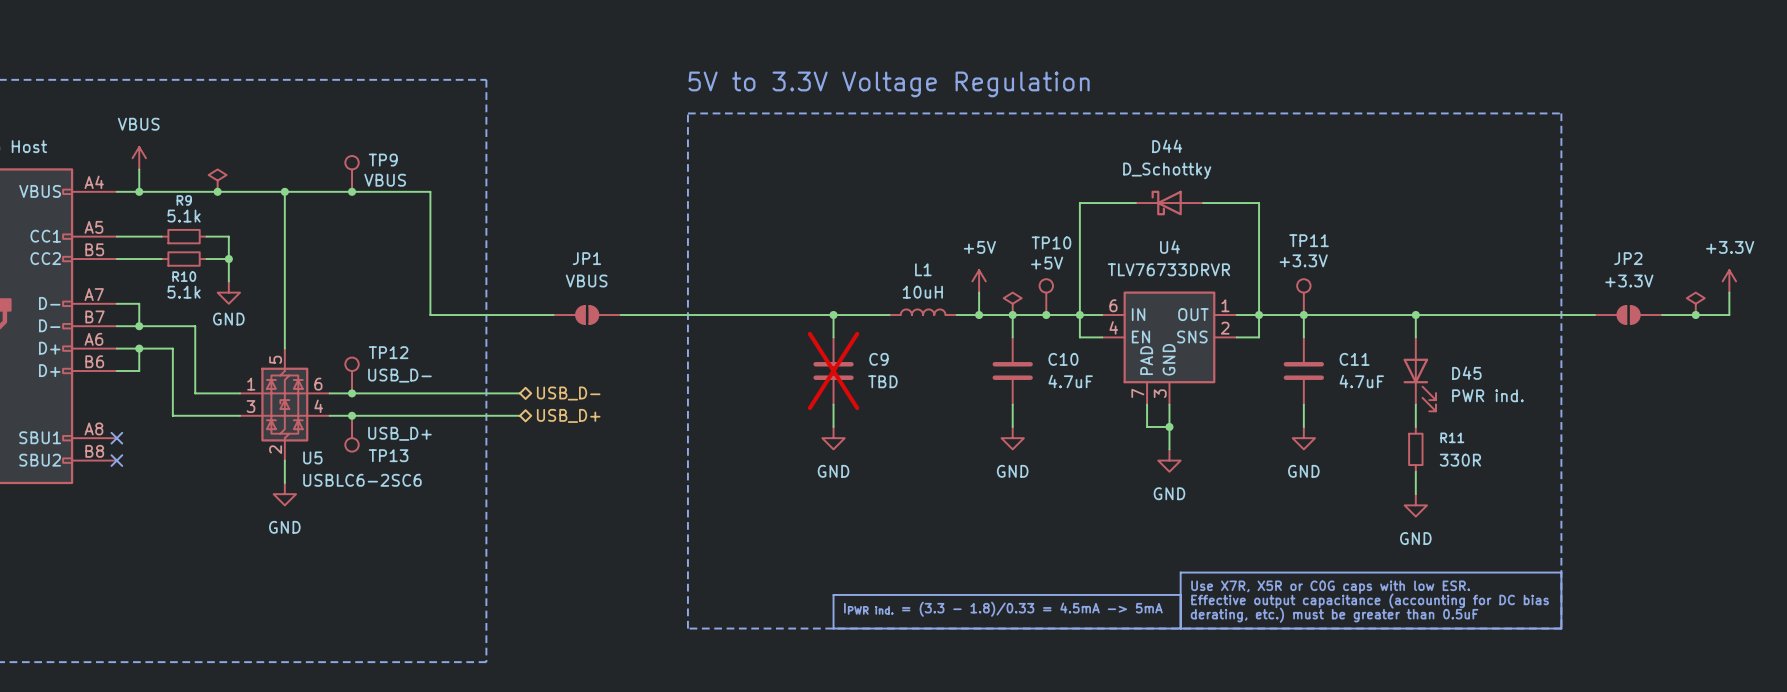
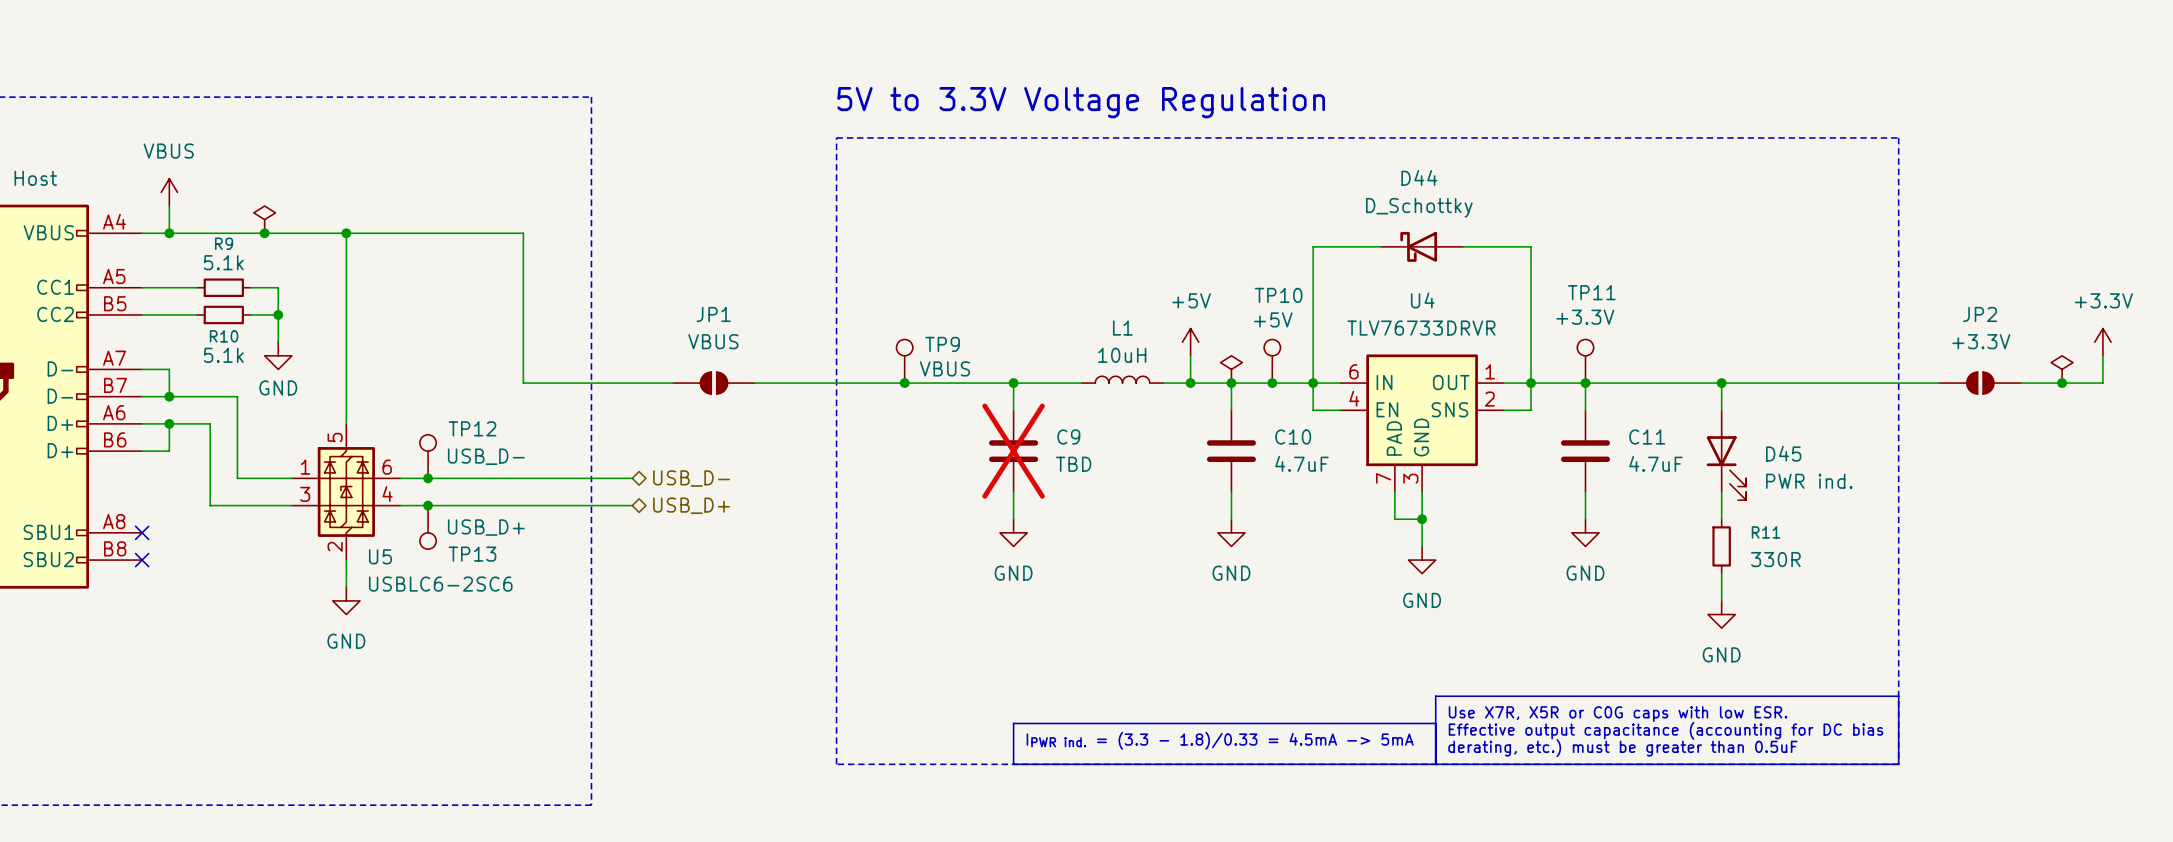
TP9 position: (352, 173) -> (904, 361)
junction: (352, 191) -> none
junction: none -> (904, 383)

